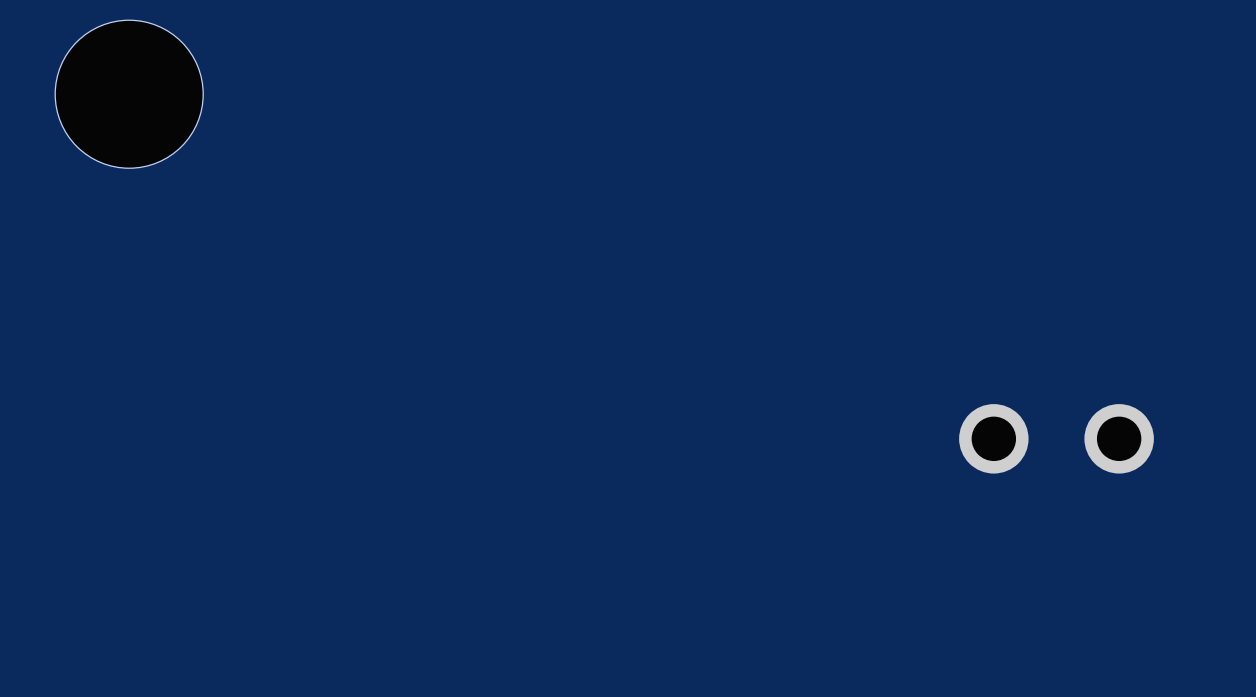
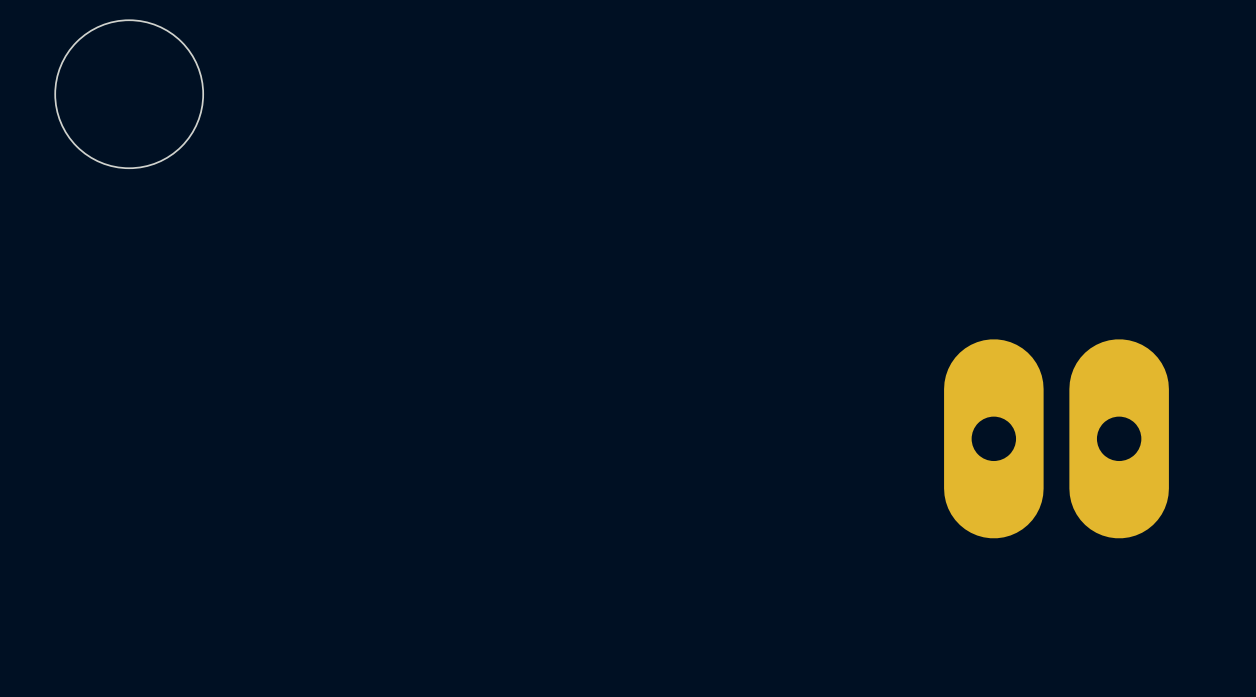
part footprint: [959, 404, 1154, 474] -> [944, 339, 1169, 539]

